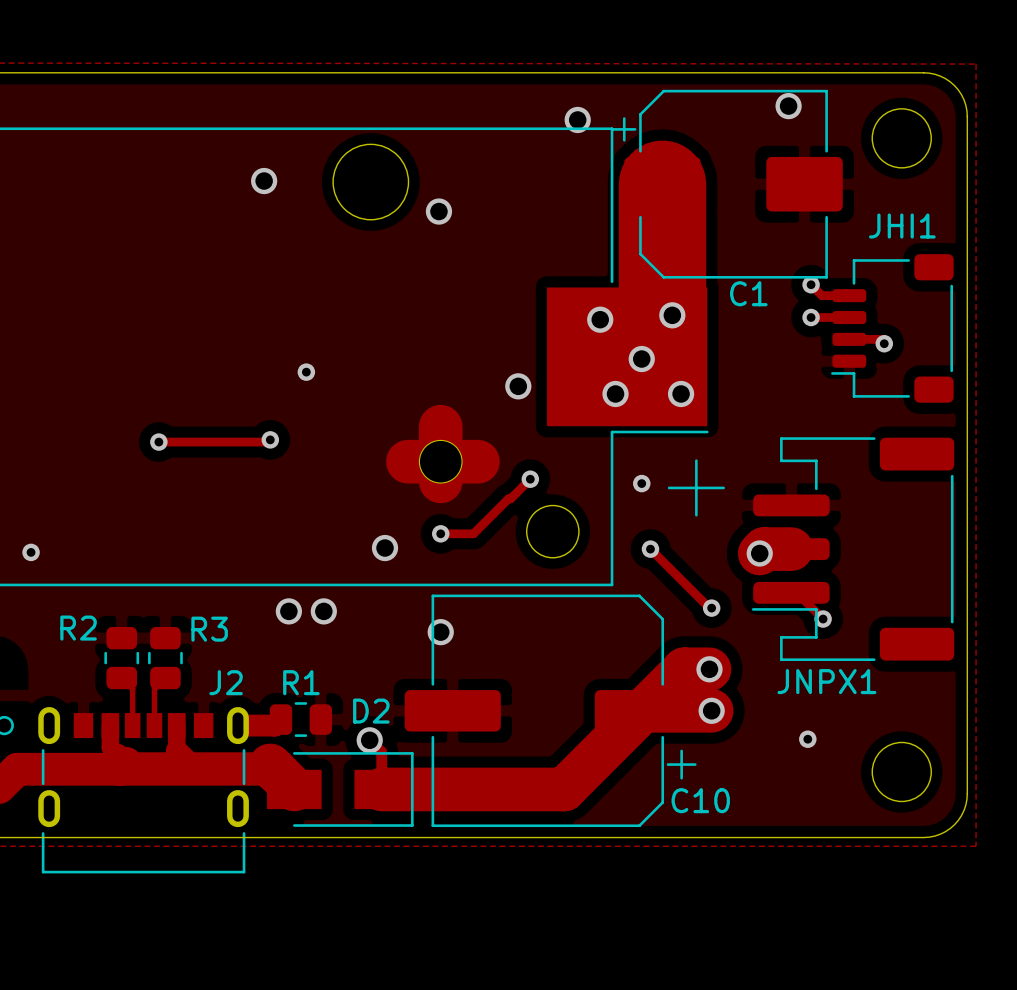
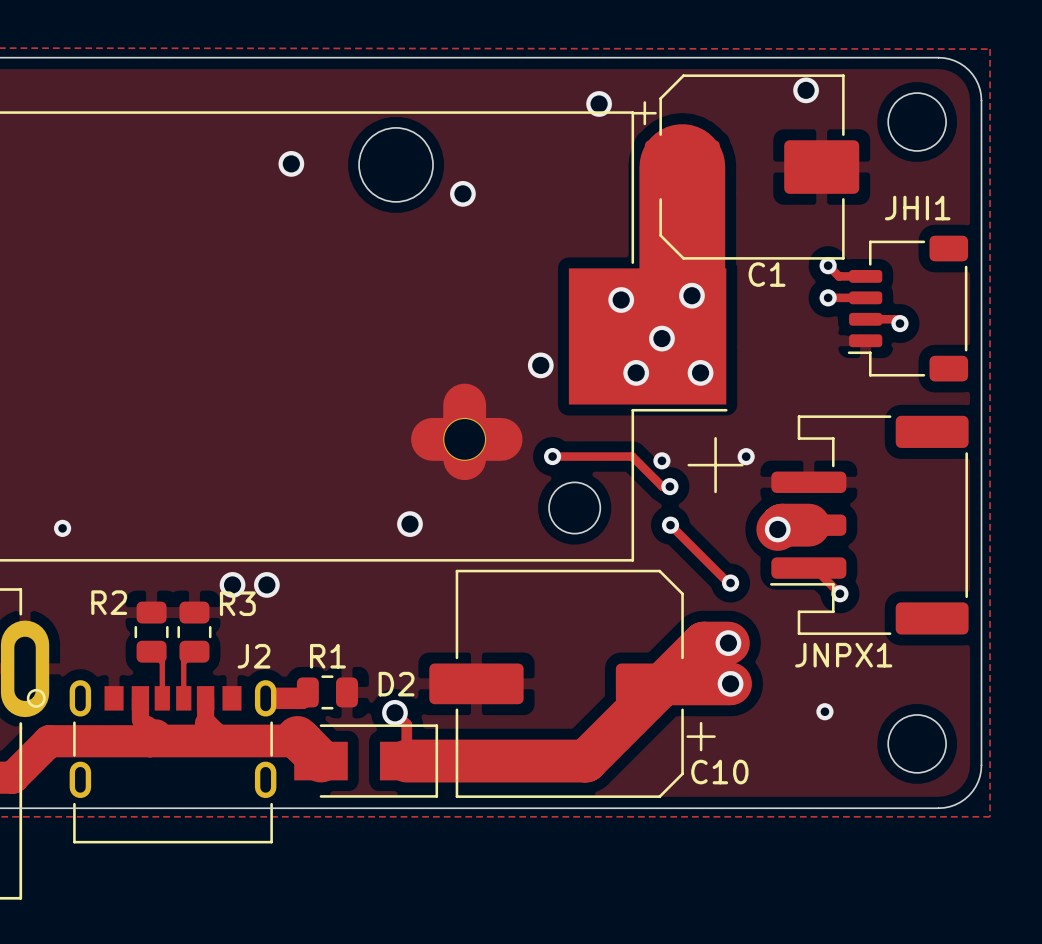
via: (306, 372) -> none
track: (270, 439) (268, 442) (158, 442) -> none
via: (270, 439) -> none
via: (158, 442) -> none
track: (530, 479) (473, 533) (440, 533) -> (552, 456) (632, 456) (662, 486) (669, 486)
via: none -> (746, 456)
via: none -> (669, 486)
via: (440, 533) -> none
via: none -> (232, 584)
via: none -> (266, 584)
via: (288, 611) -> none
via: (323, 611) -> none
via: (440, 632) -> none

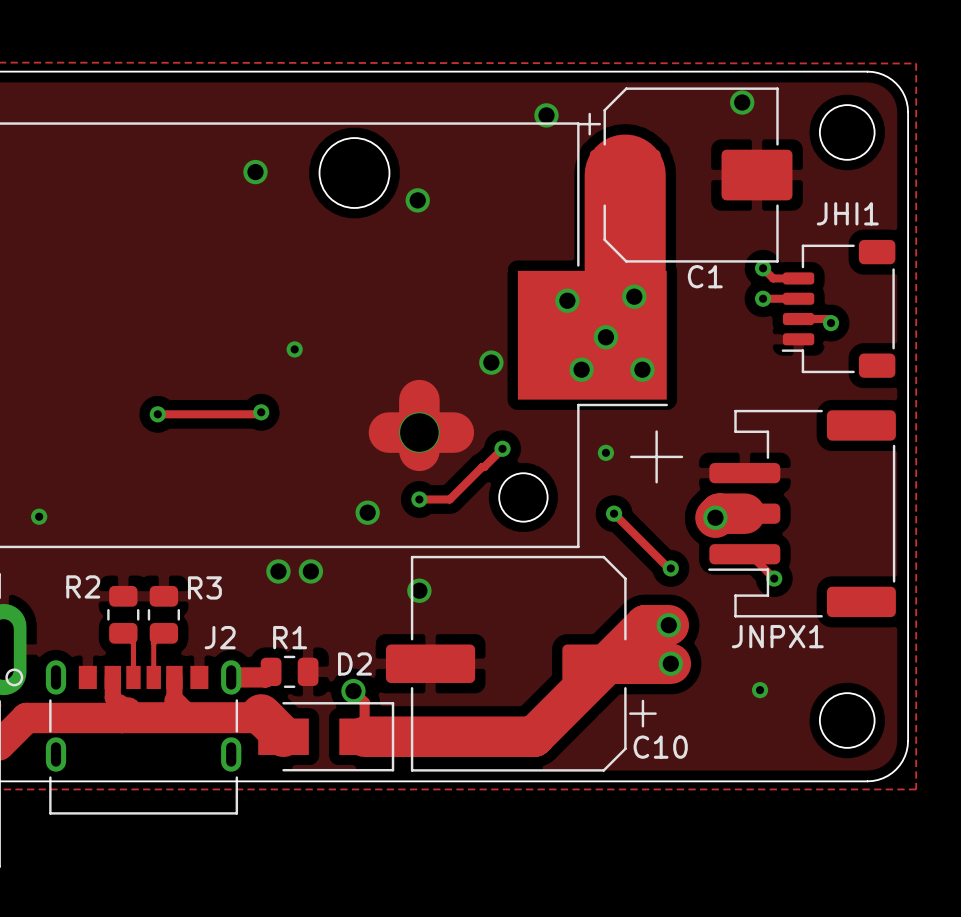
via: none -> (294, 349)
track: none -> (261, 412) (259, 414) (157, 414)
via: none -> (261, 412)
via: none -> (157, 414)
track: (552, 456) (632, 456) (662, 486) (669, 486) -> (502, 448) (449, 499) (419, 499)
via: (746, 456) -> none
via: (669, 486) -> none
via: none -> (419, 499)
via: (232, 584) -> none
via: (266, 584) -> none
via: none -> (278, 571)
via: none -> (310, 571)
via: none -> (419, 590)

